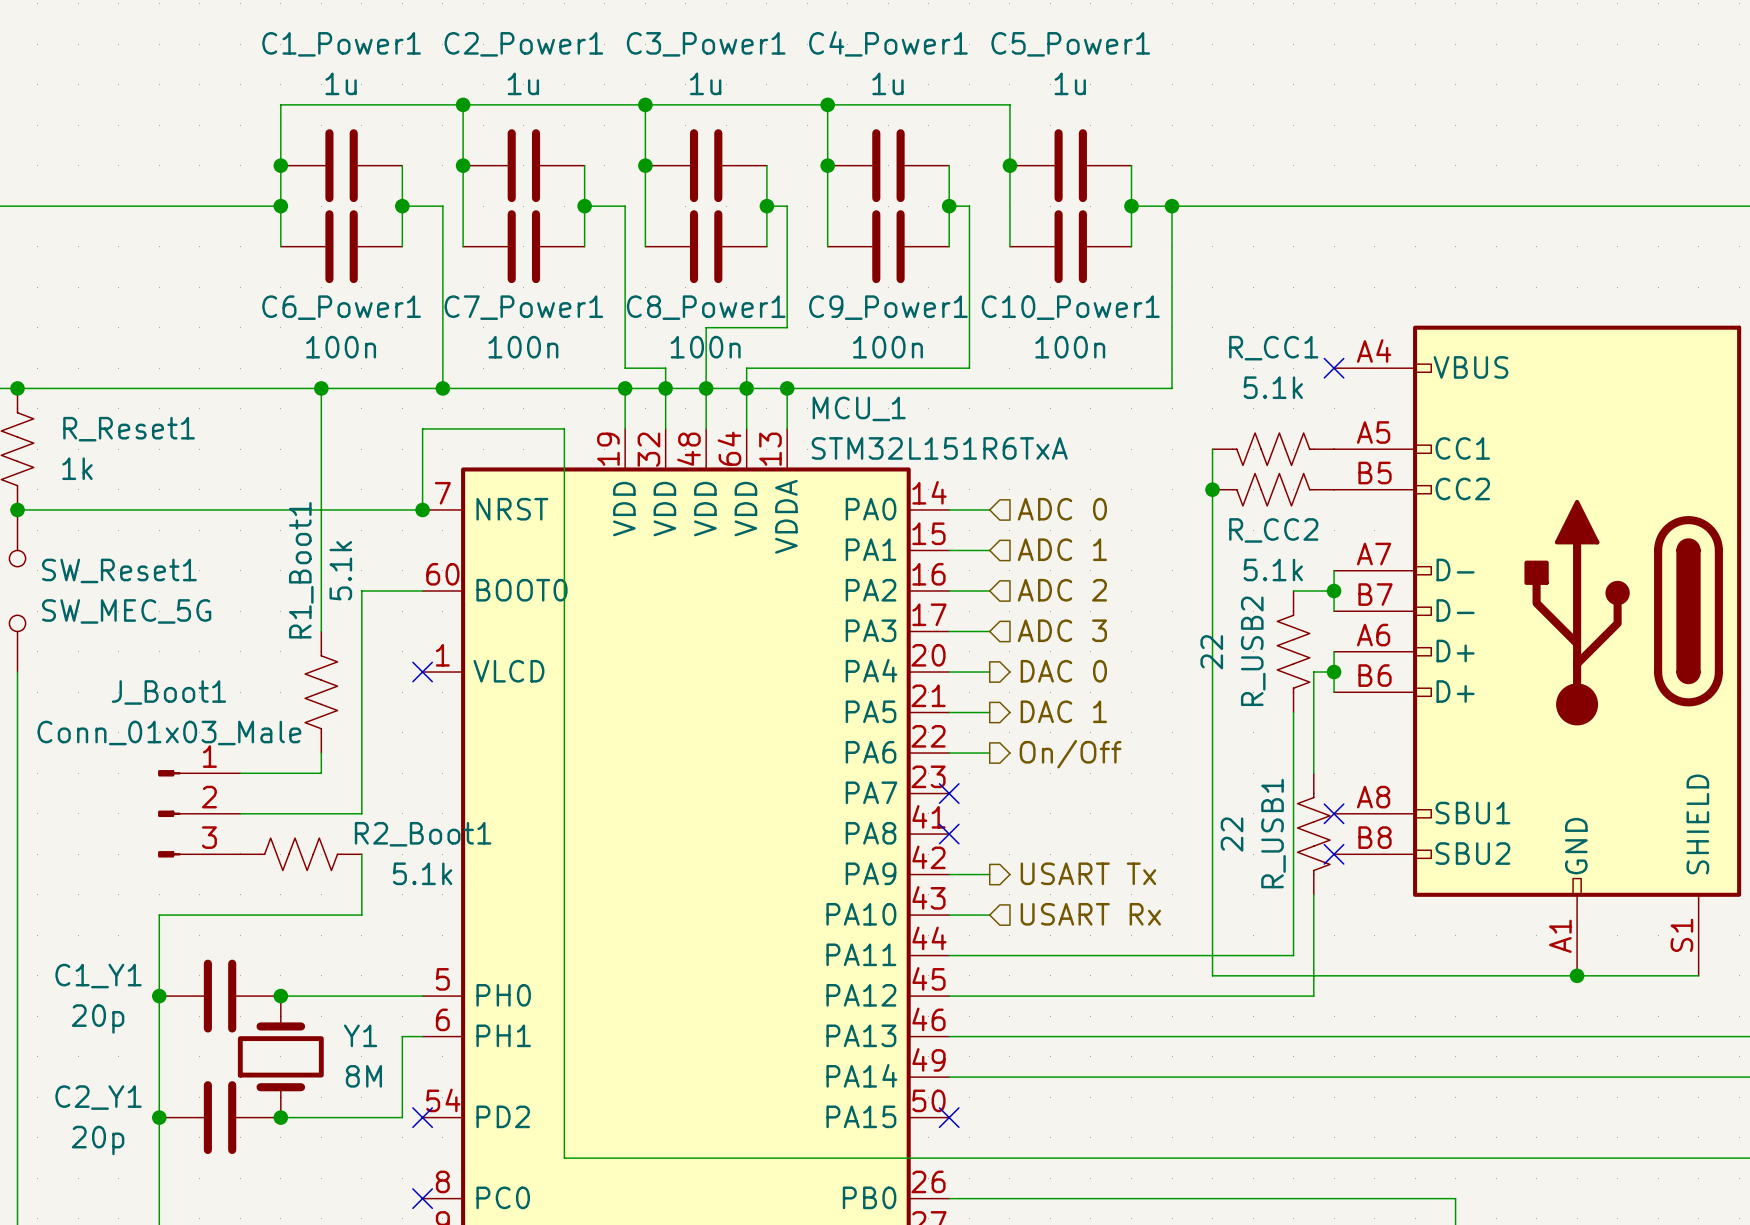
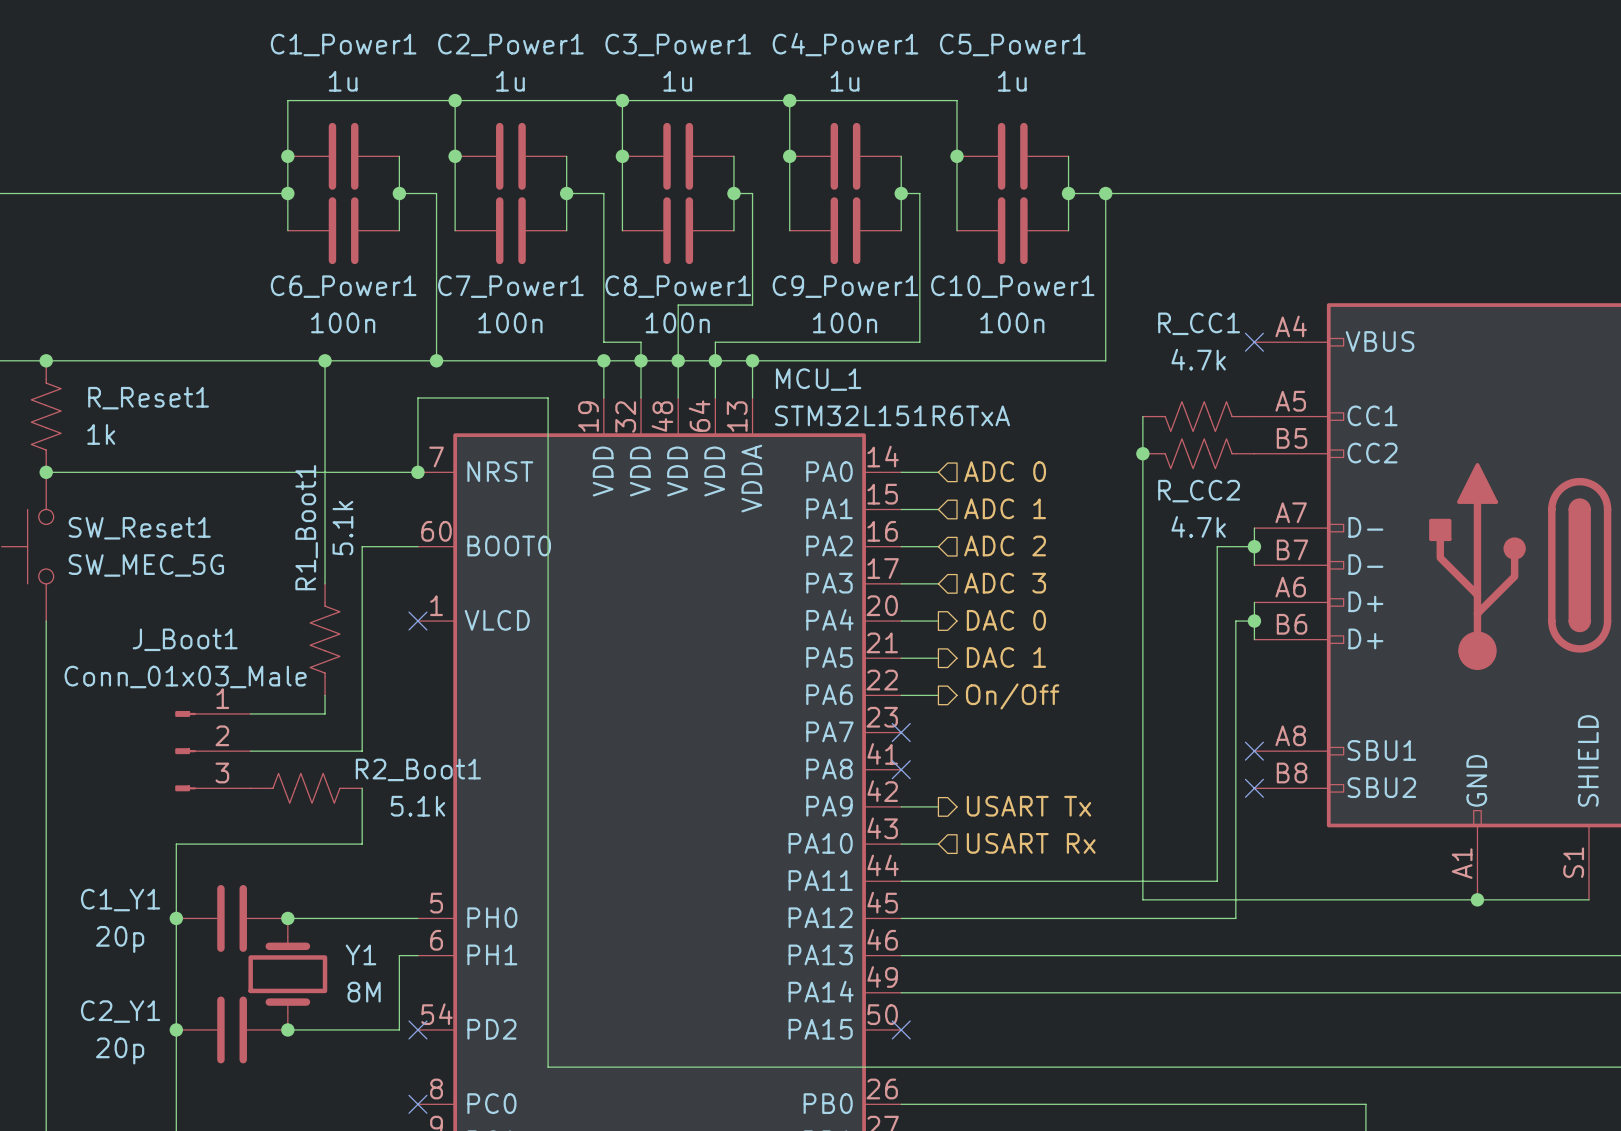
R_CC1 value: 5.1k (1273, 387) -> 4.7k (1198, 359)
R_CC2 value: 5.1k (1273, 569) -> 4.7k (1198, 526)
wire: none -> (1217, 546) (1217, 658)
R_USB2: 22 (1293, 651) -> none
wire: none -> (1235, 713) (1235, 825)
R_USB1: 22 (1313, 834) -> none

